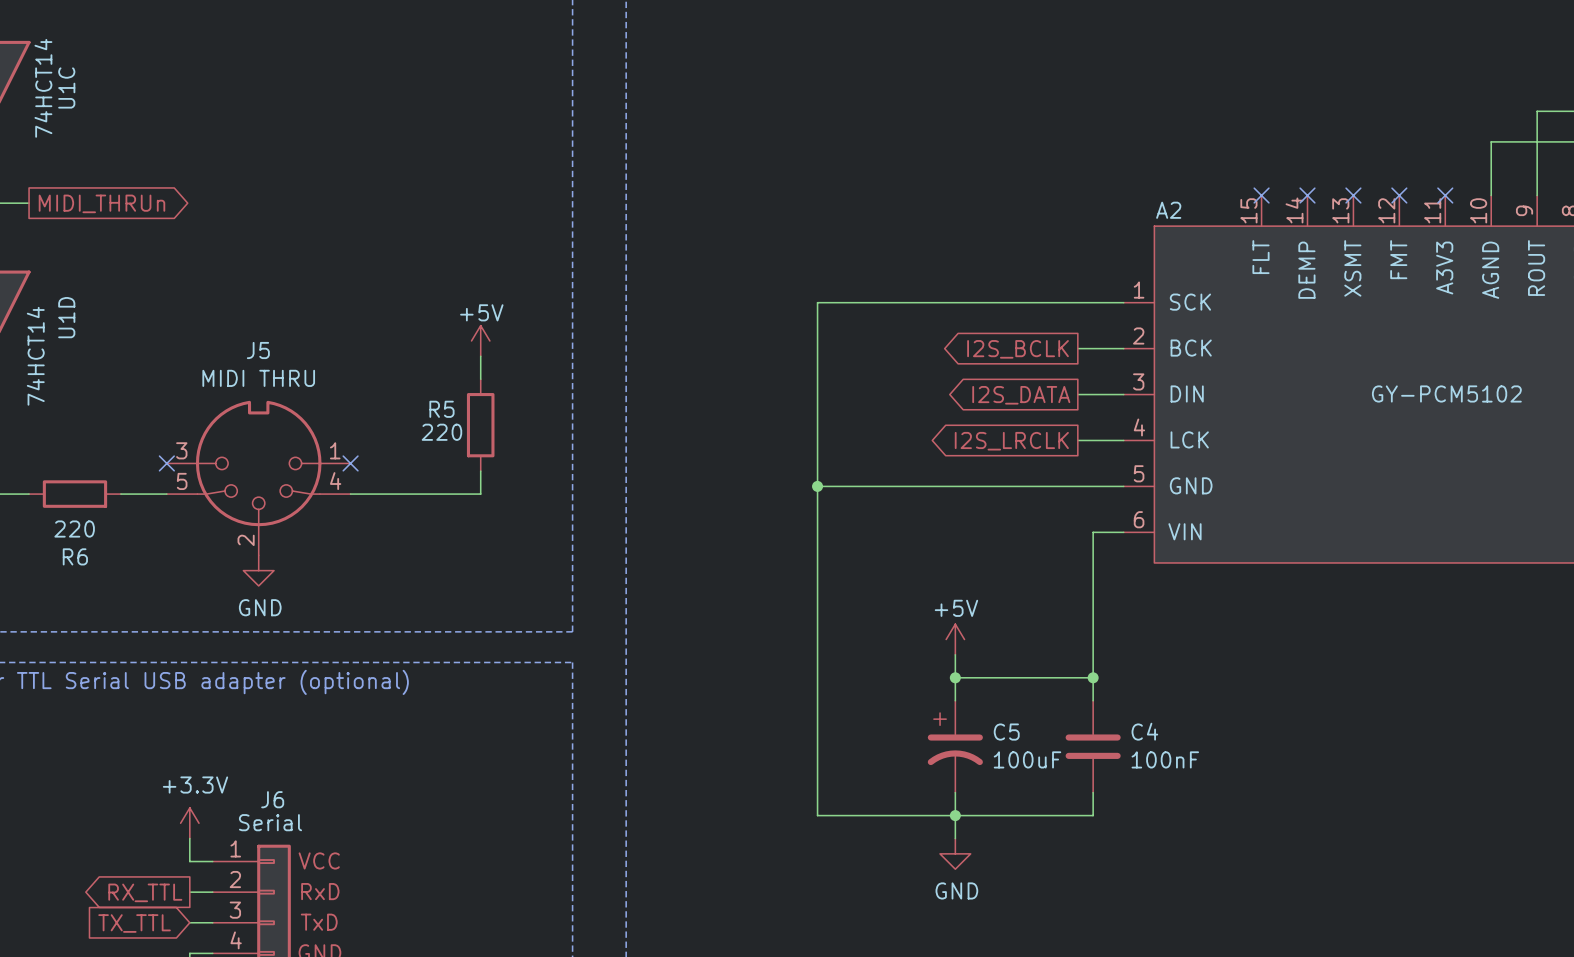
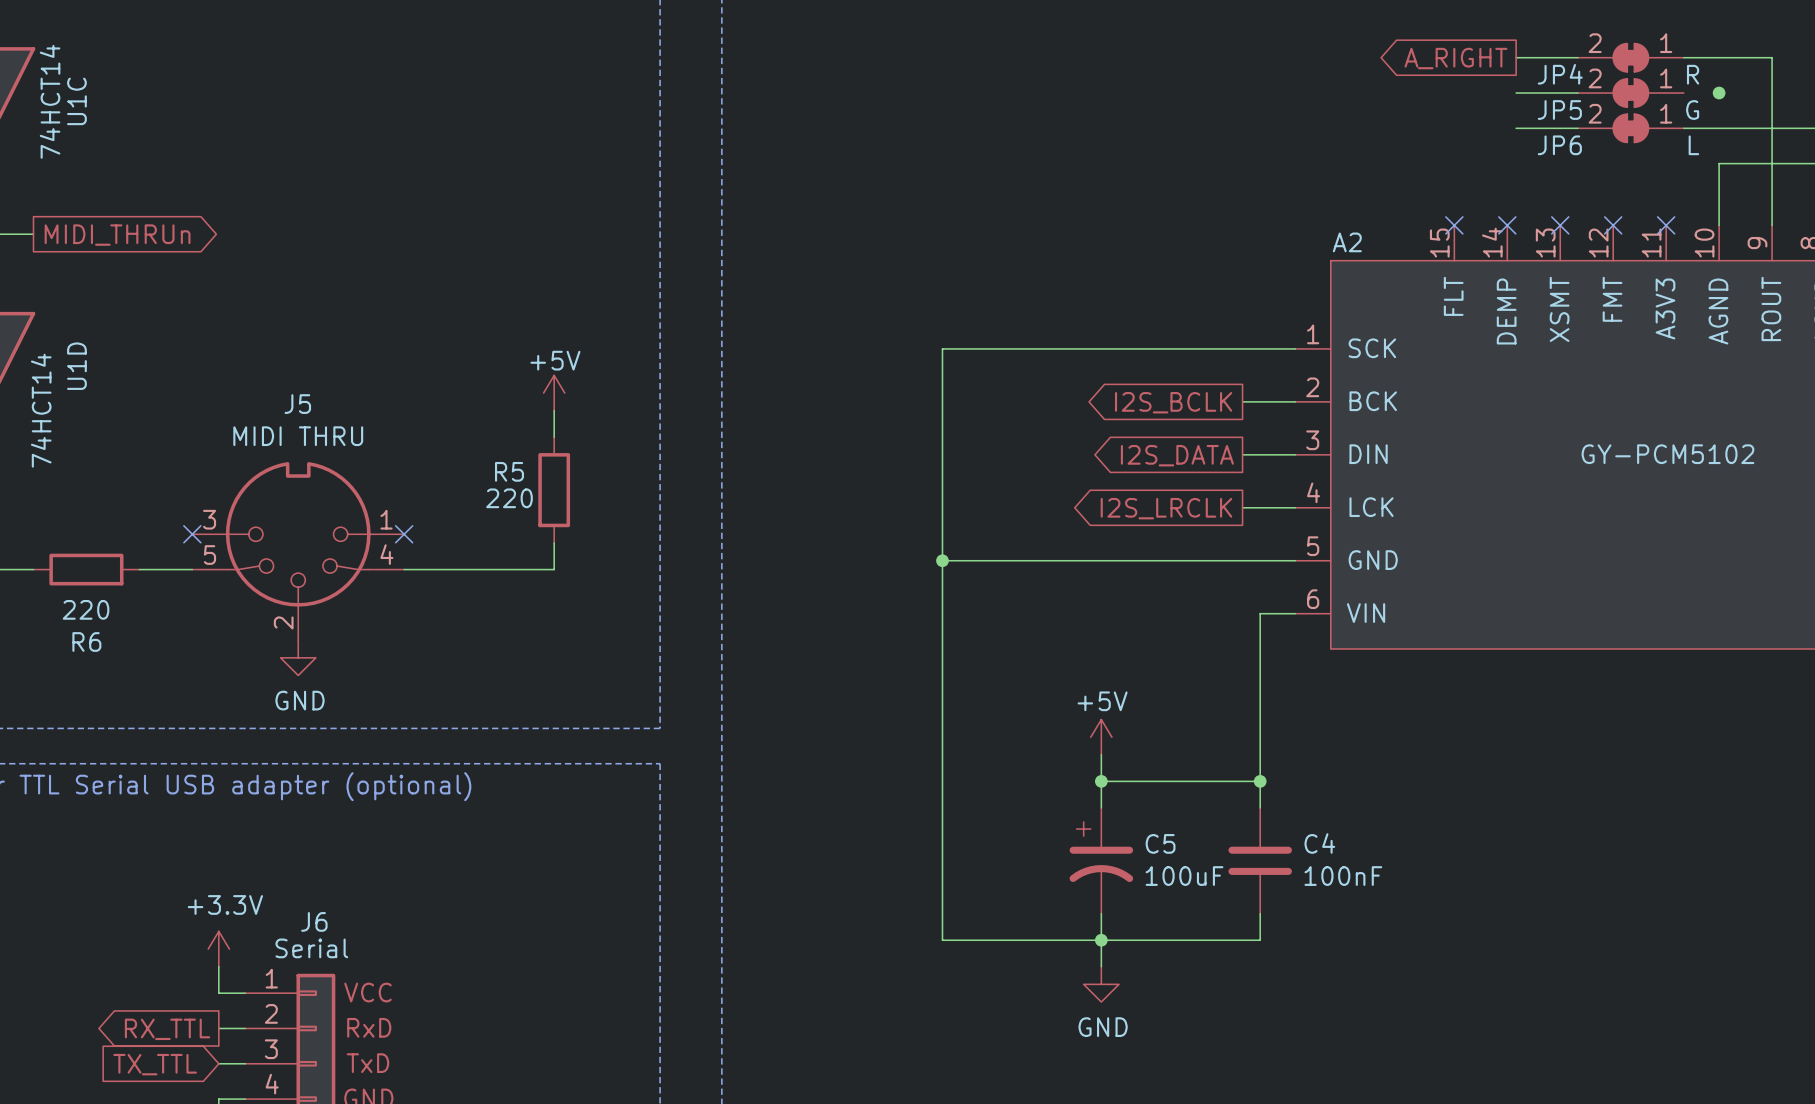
global label: none -> A_RIGHT (1456, 58)
wire: none -> (1516, 57) (1577, 57)
JP4: none -> R (1630, 57)
wire: none -> (1683, 57) (1772, 57) (1772, 128) (1683, 128)
wire: none -> (1516, 93) (1577, 93)
JP5: none -> G (1630, 93)
junction: none -> (1719, 93)
wire: none -> (1516, 128) (1577, 128)
JP6: none -> L (1630, 128)

